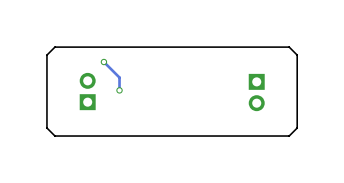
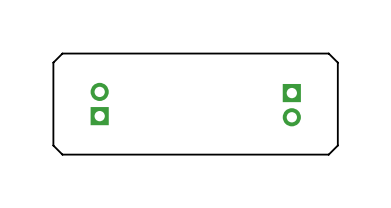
track: (103, 62) (119, 77) (119, 90) -> none
via: (103, 62) -> none
via: (119, 90) -> none

